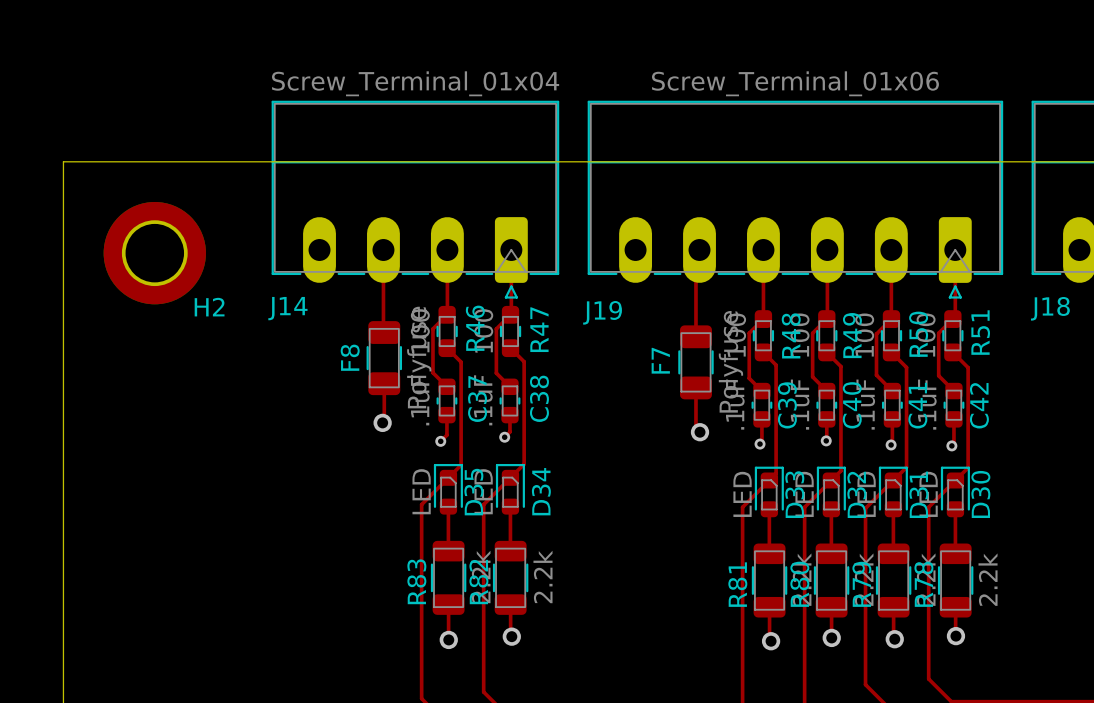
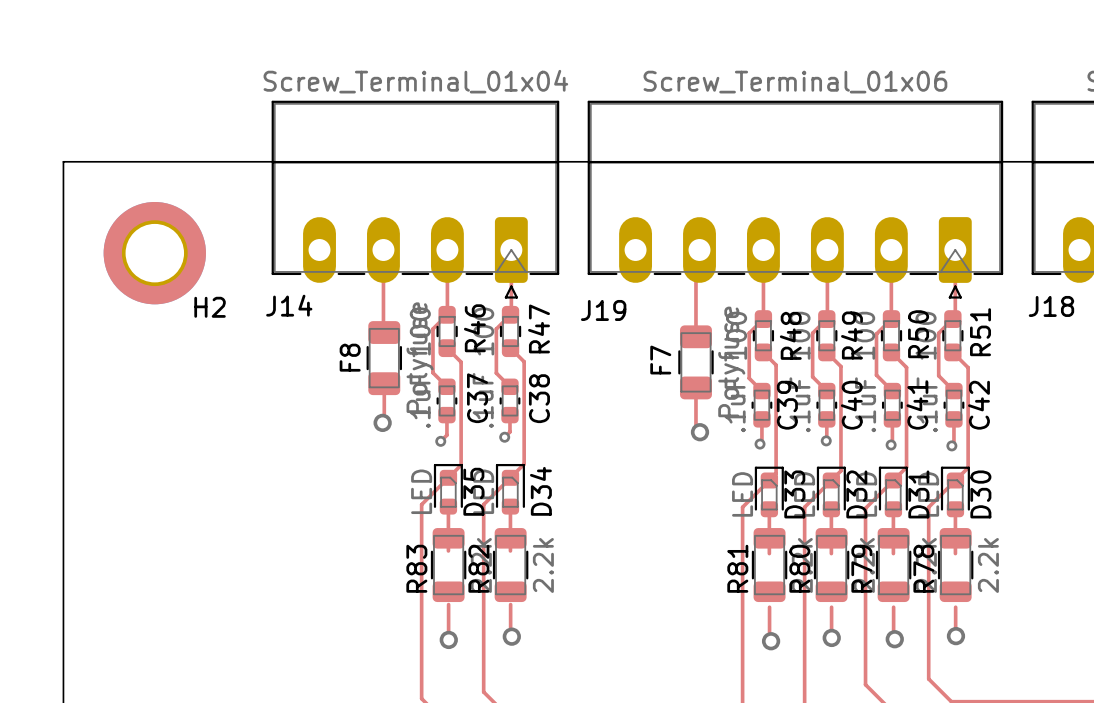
R83 position: (448, 577) -> (448, 565)
R82 position: (510, 577) -> (510, 565)
R81 position: (769, 580) -> (769, 565)
R80 position: (831, 580) -> (831, 565)
R79 position: (893, 580) -> (893, 565)
R78 position: (955, 580) -> (955, 565)

